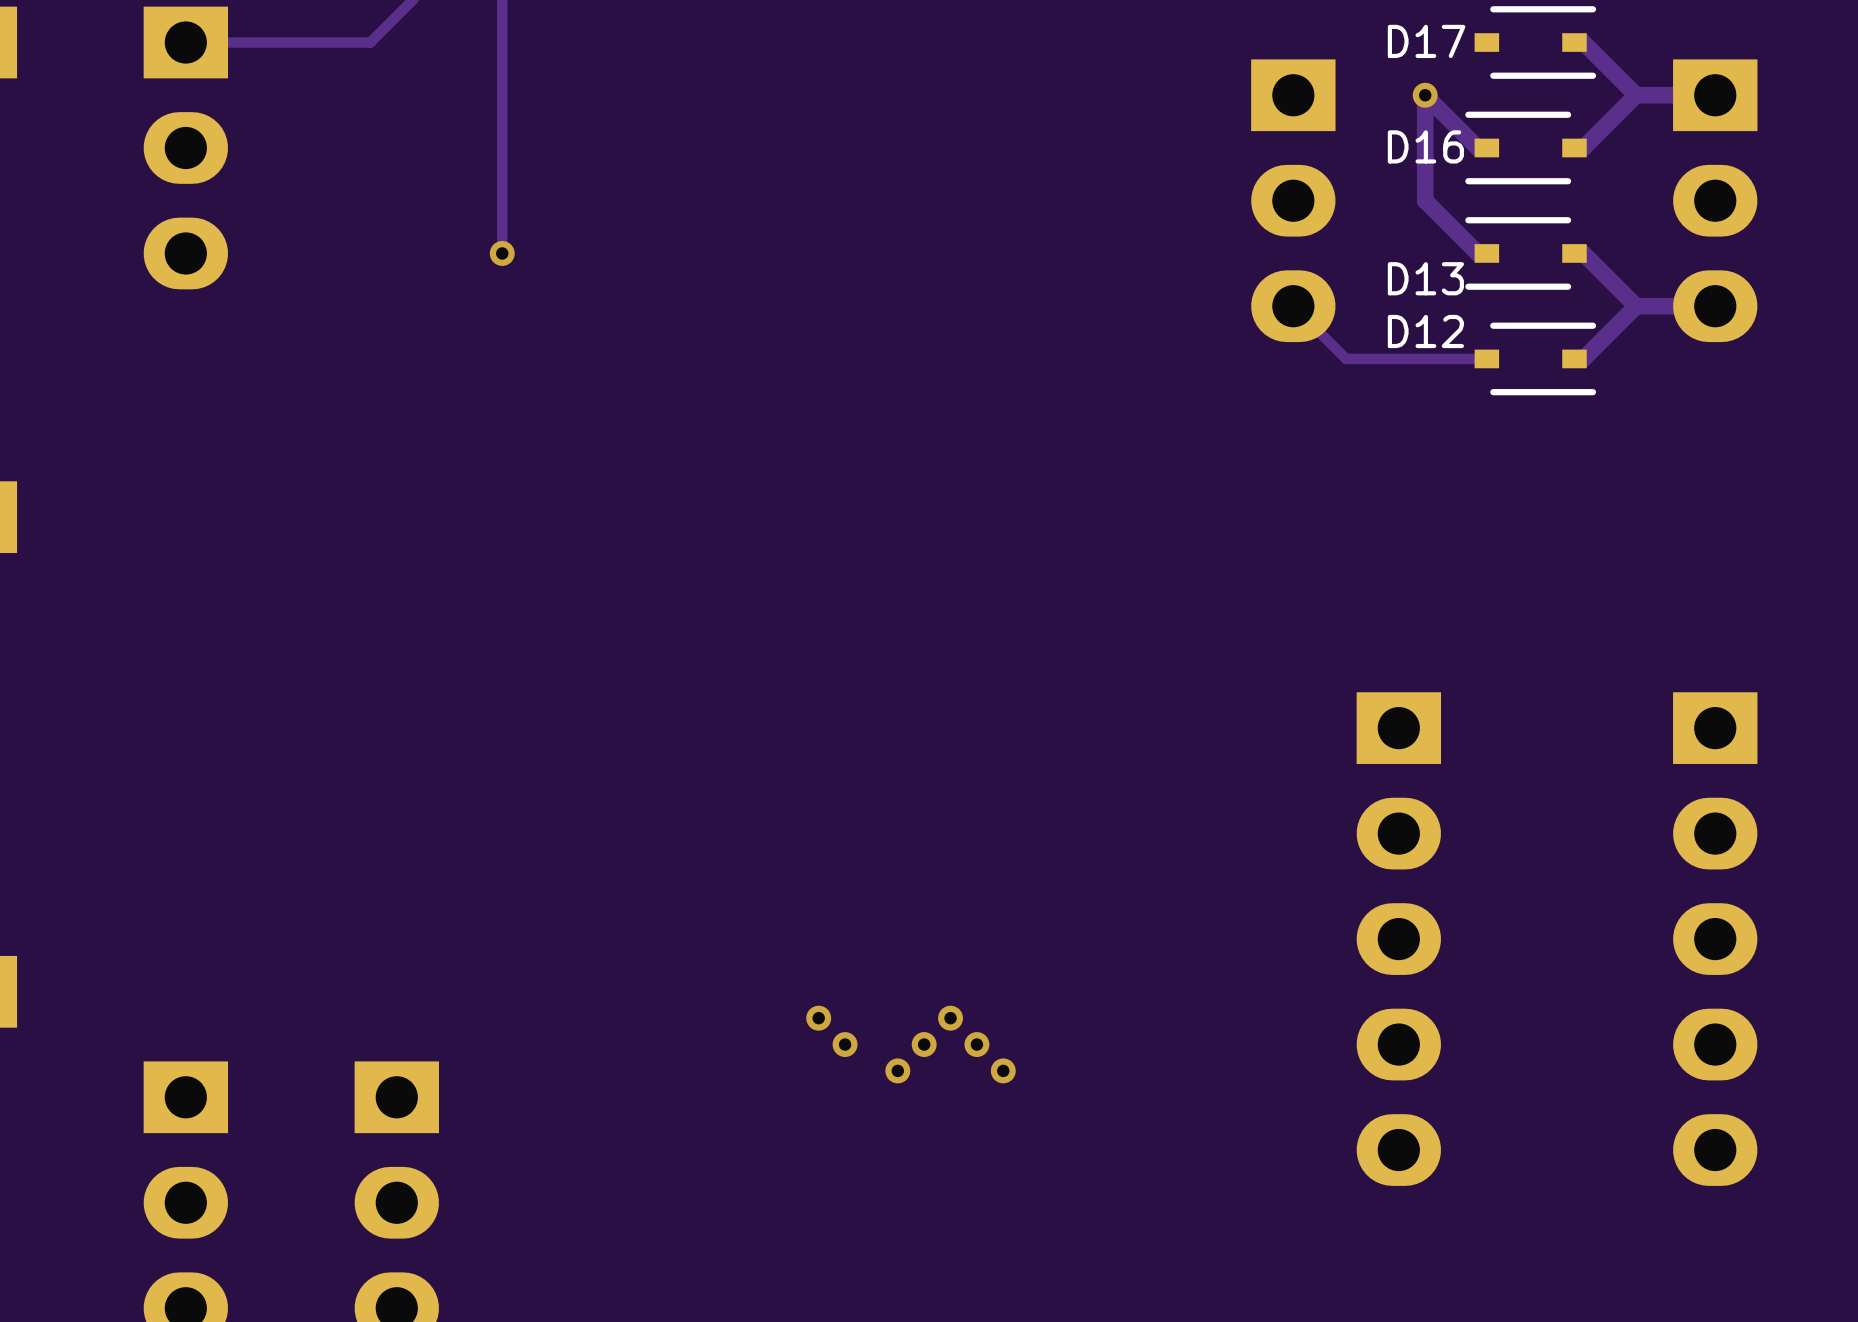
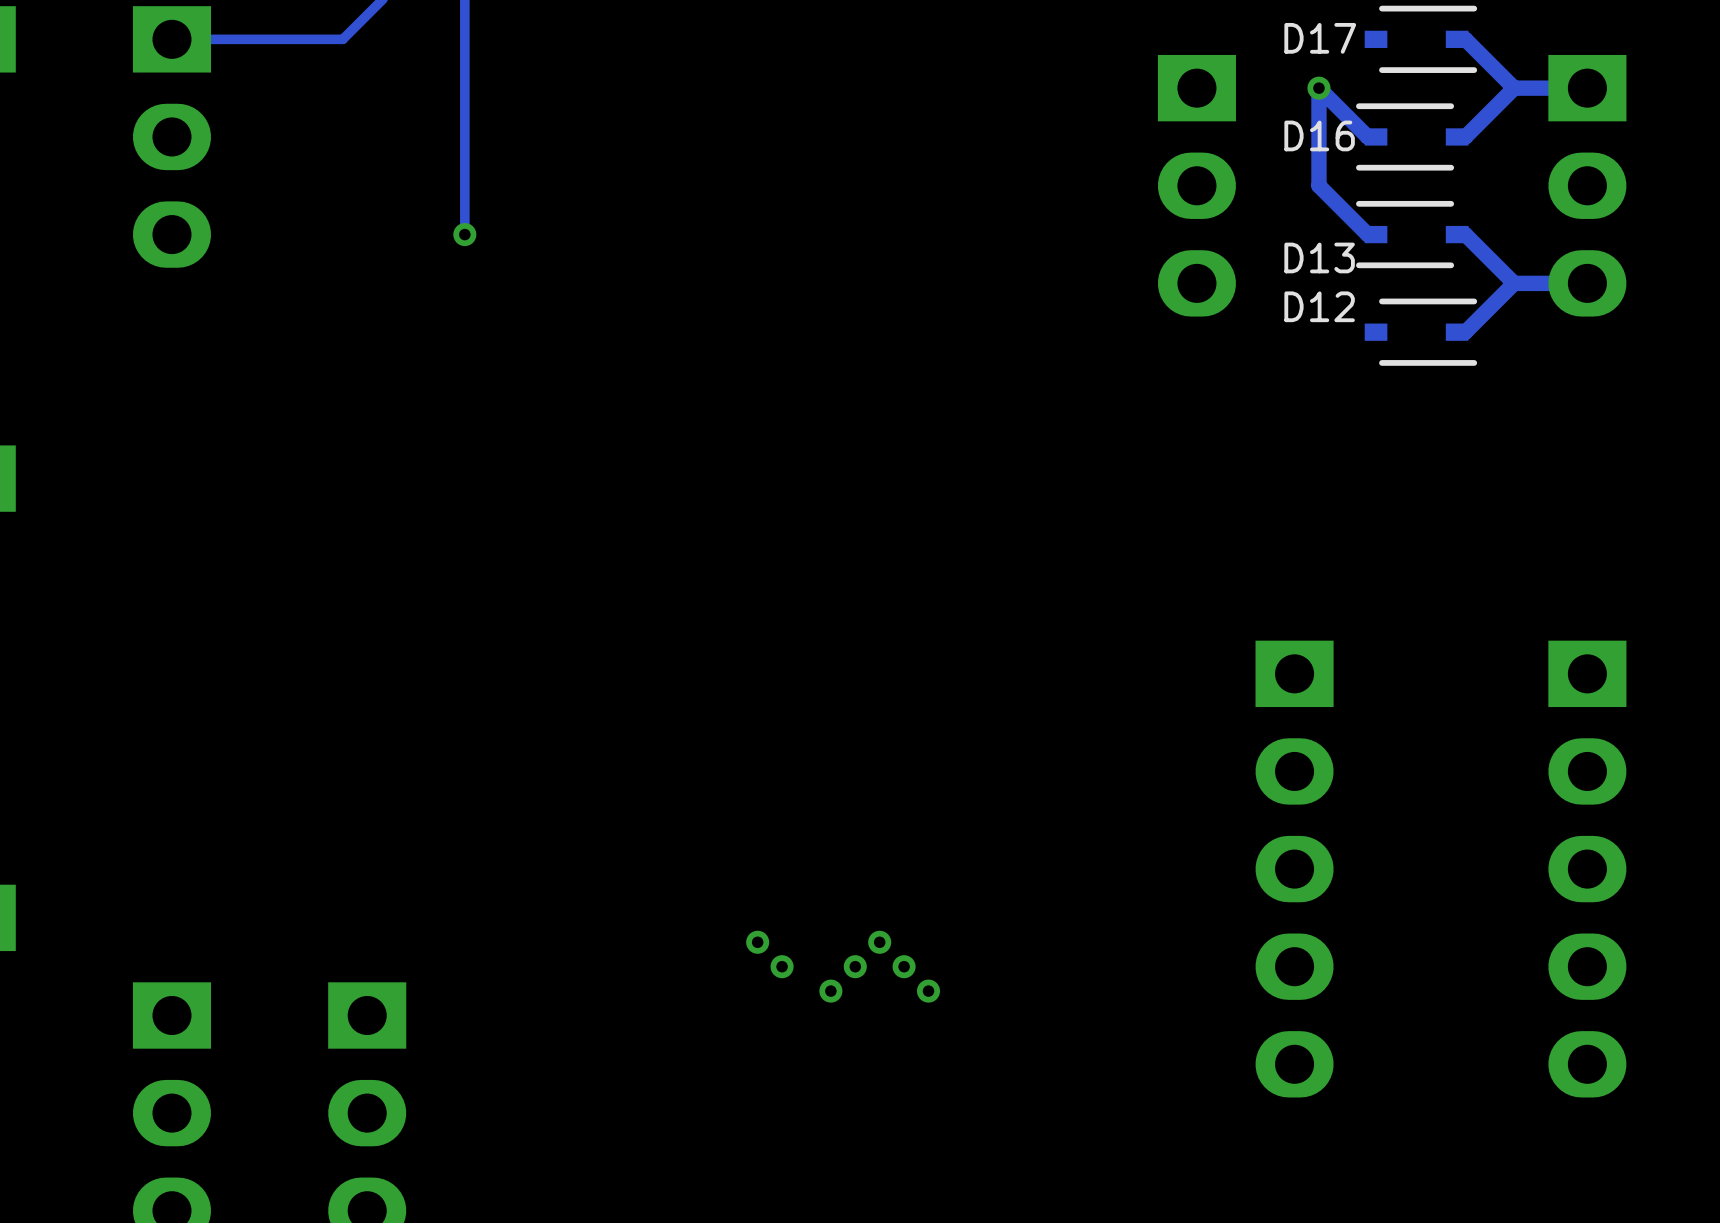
track: (1293, 306) (1346, 358) (1486, 358) -> none

